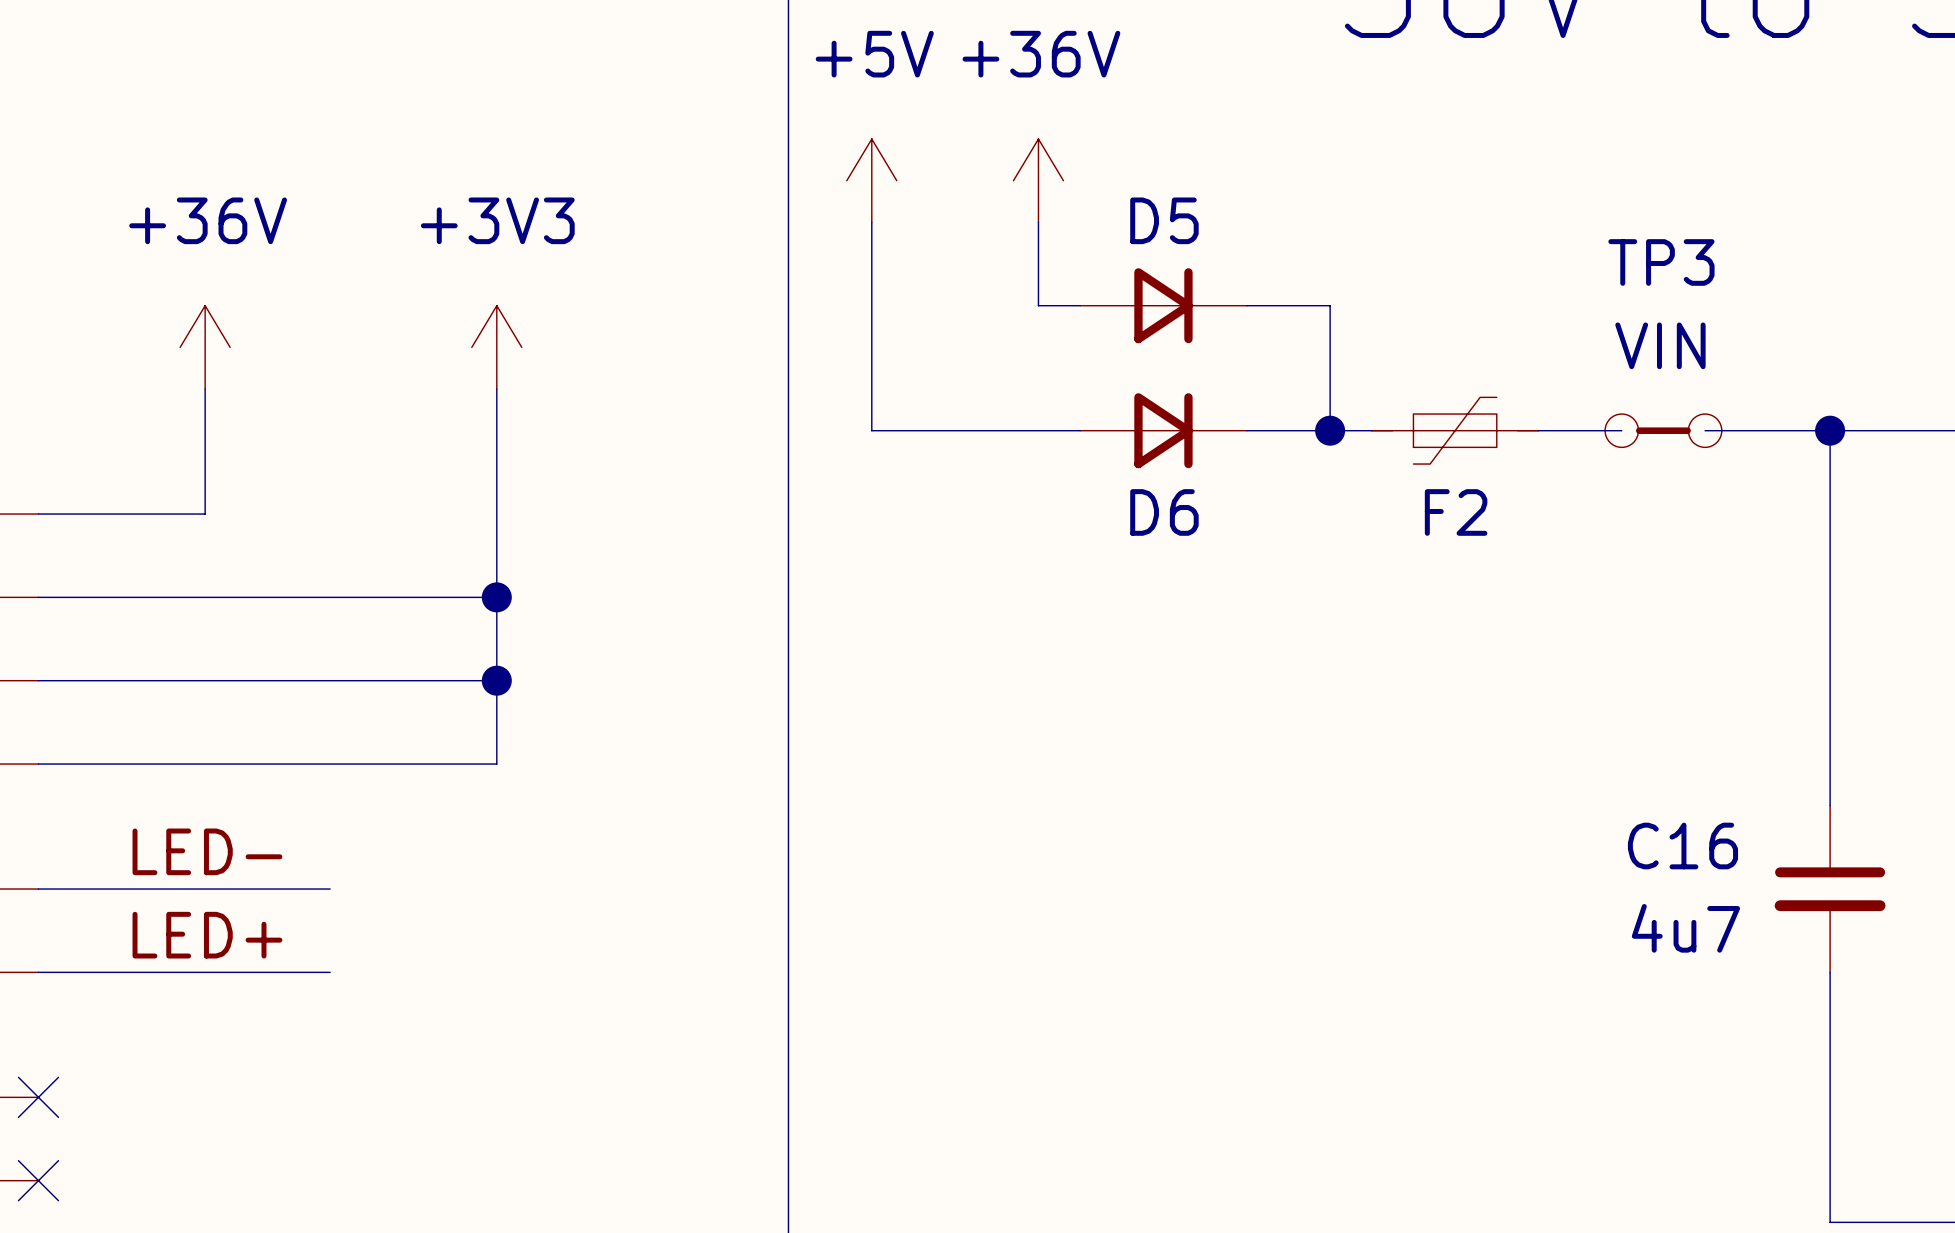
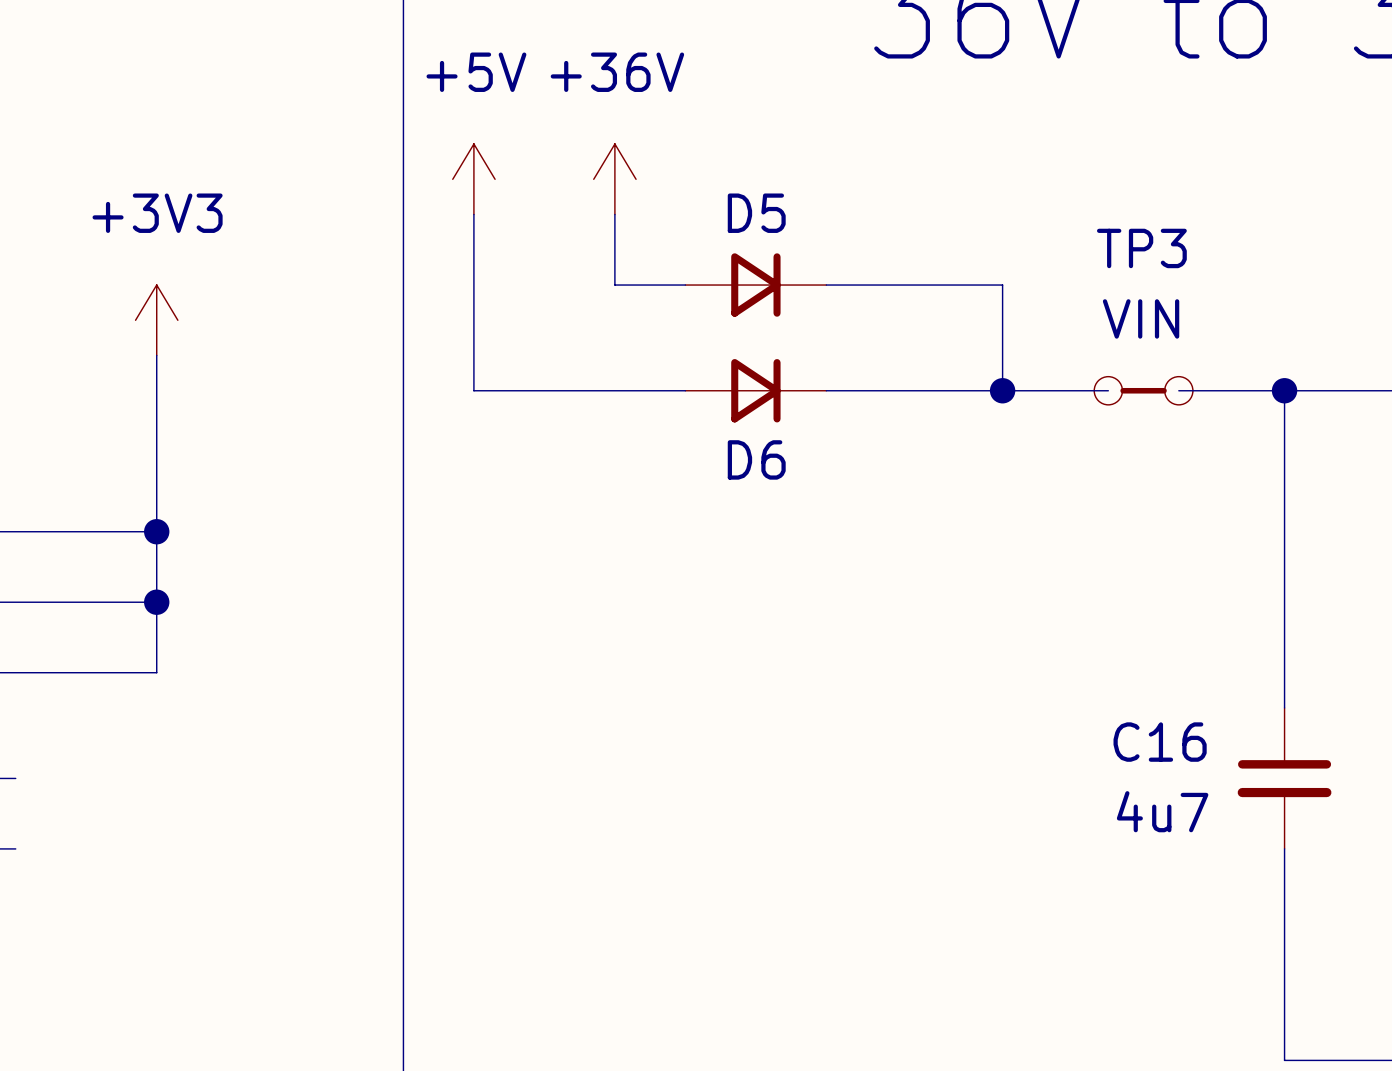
D5 position: (1163, 305) -> (755, 285)
wire: (1330, 305) (1330, 430) -> (861, 285) (1002, 285) (1002, 390)
D6 position: (1163, 430) -> (755, 390)
junction position: (1330, 430) -> (1002, 390)
F2: (1455, 430) -> none

